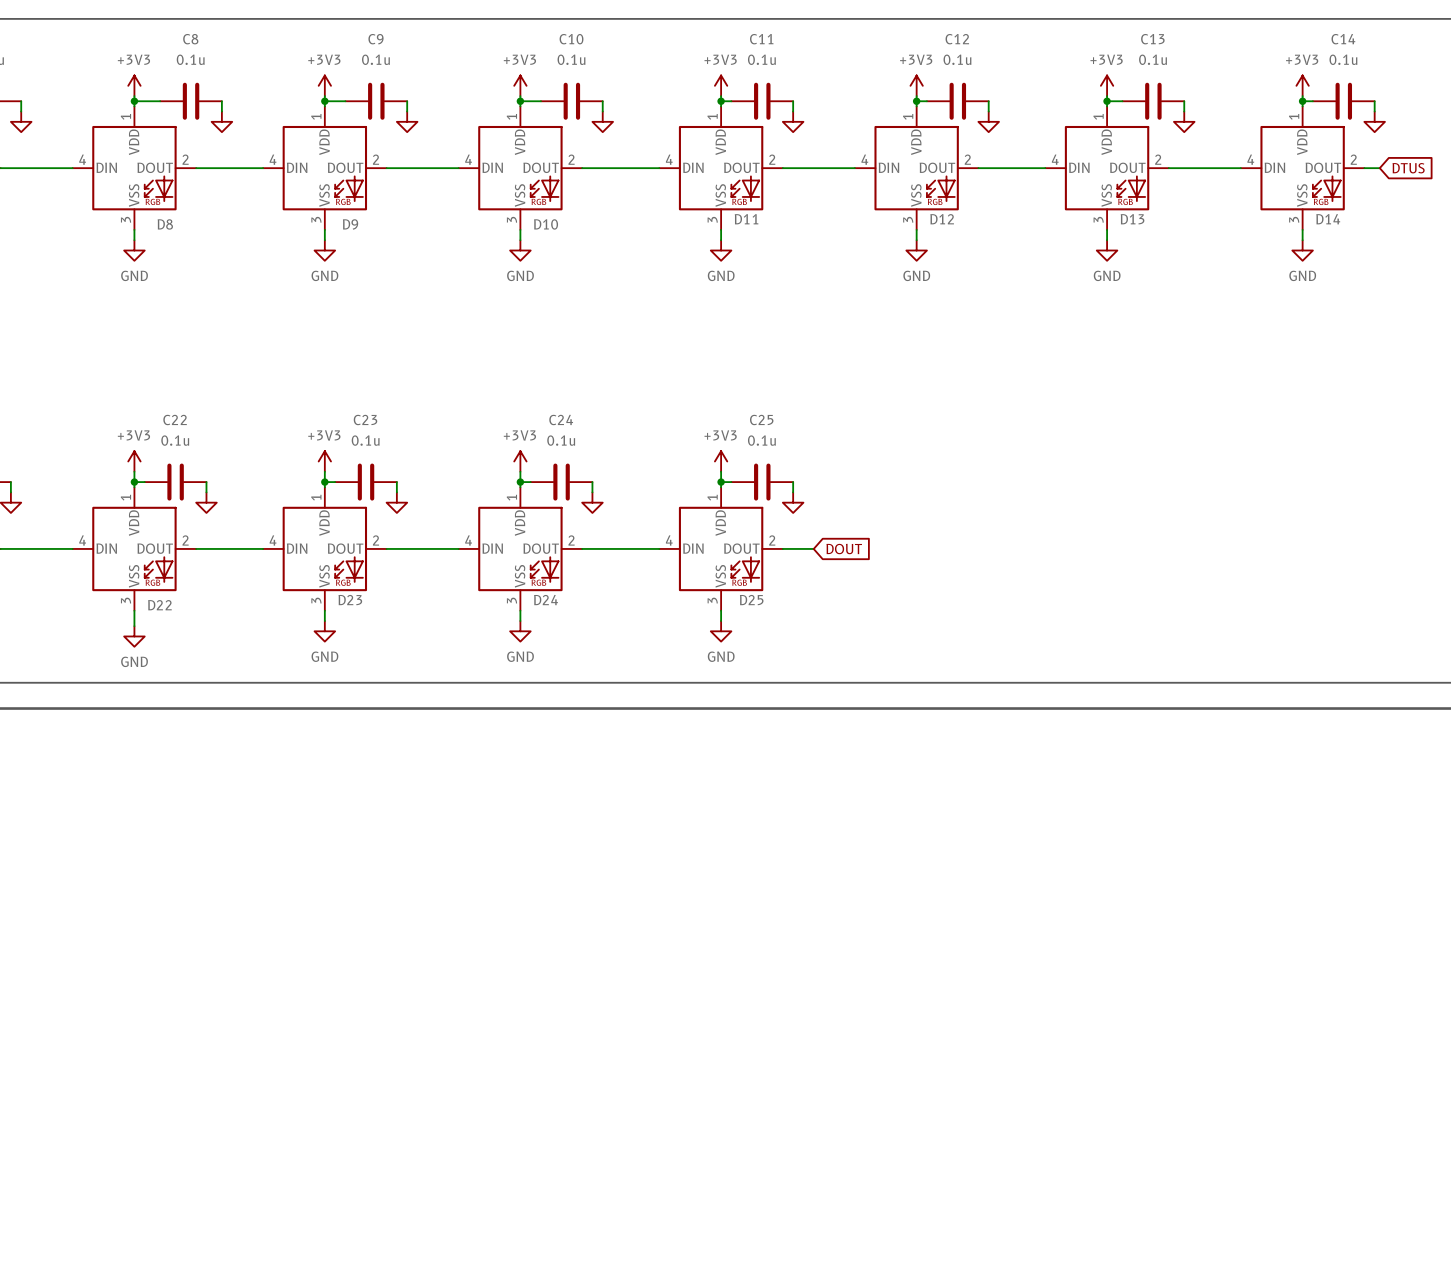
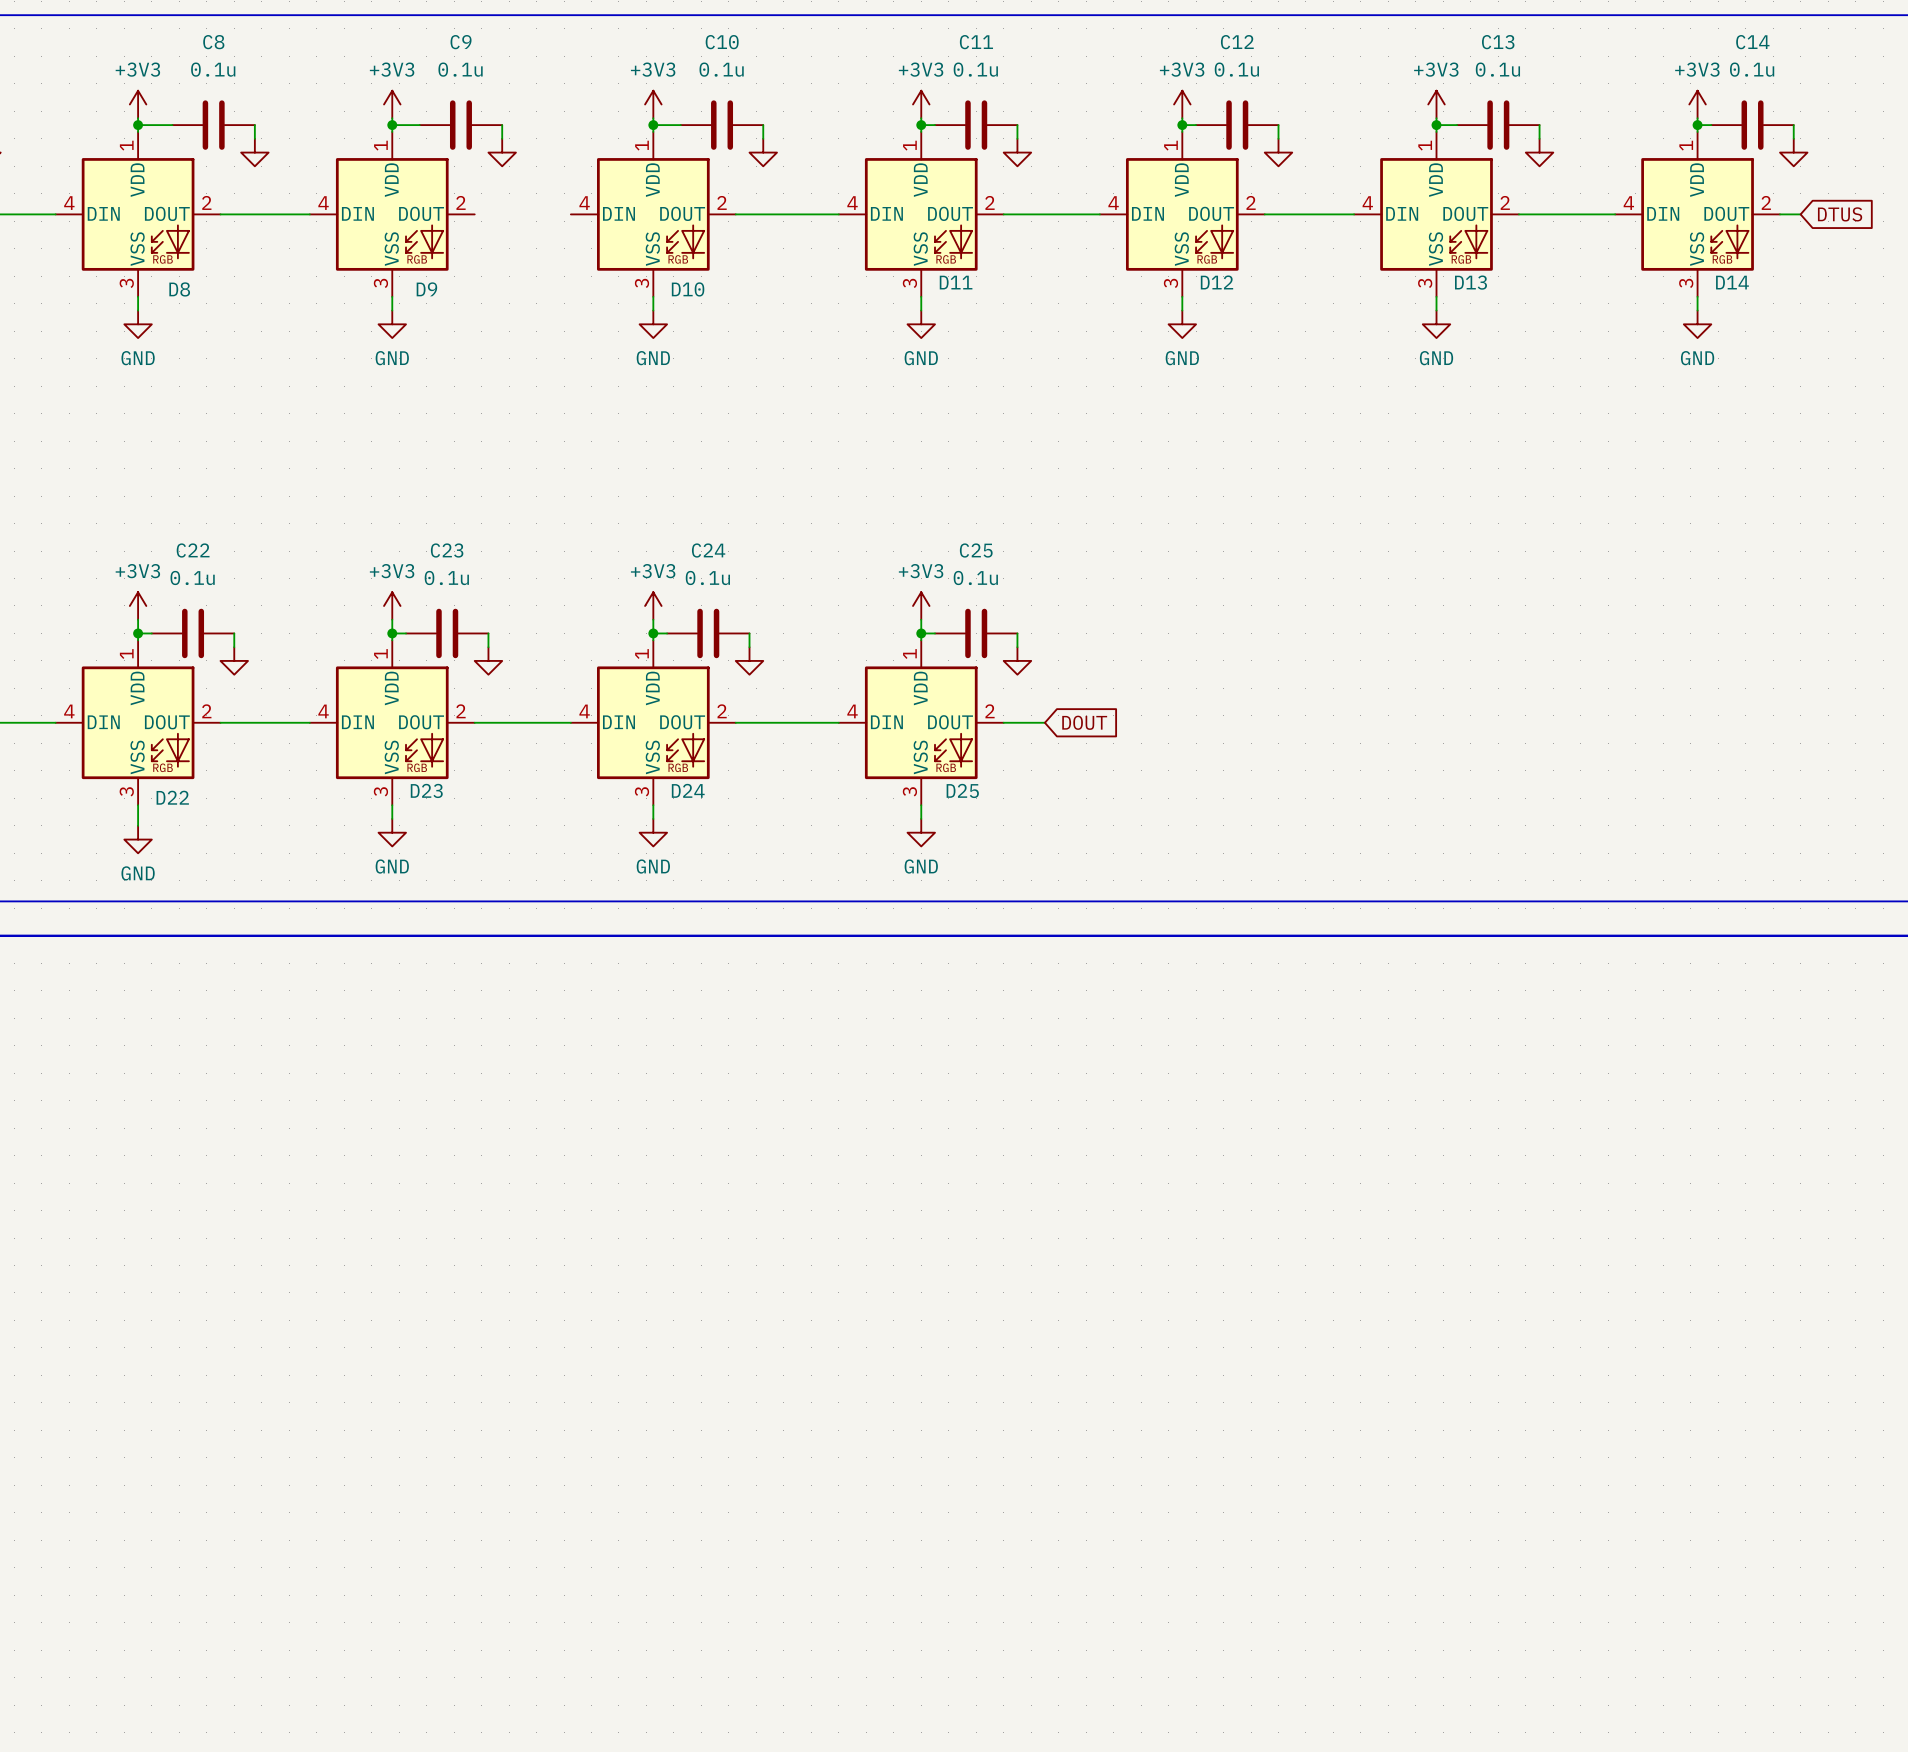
wire: (386, 168) (458, 168) -> none

